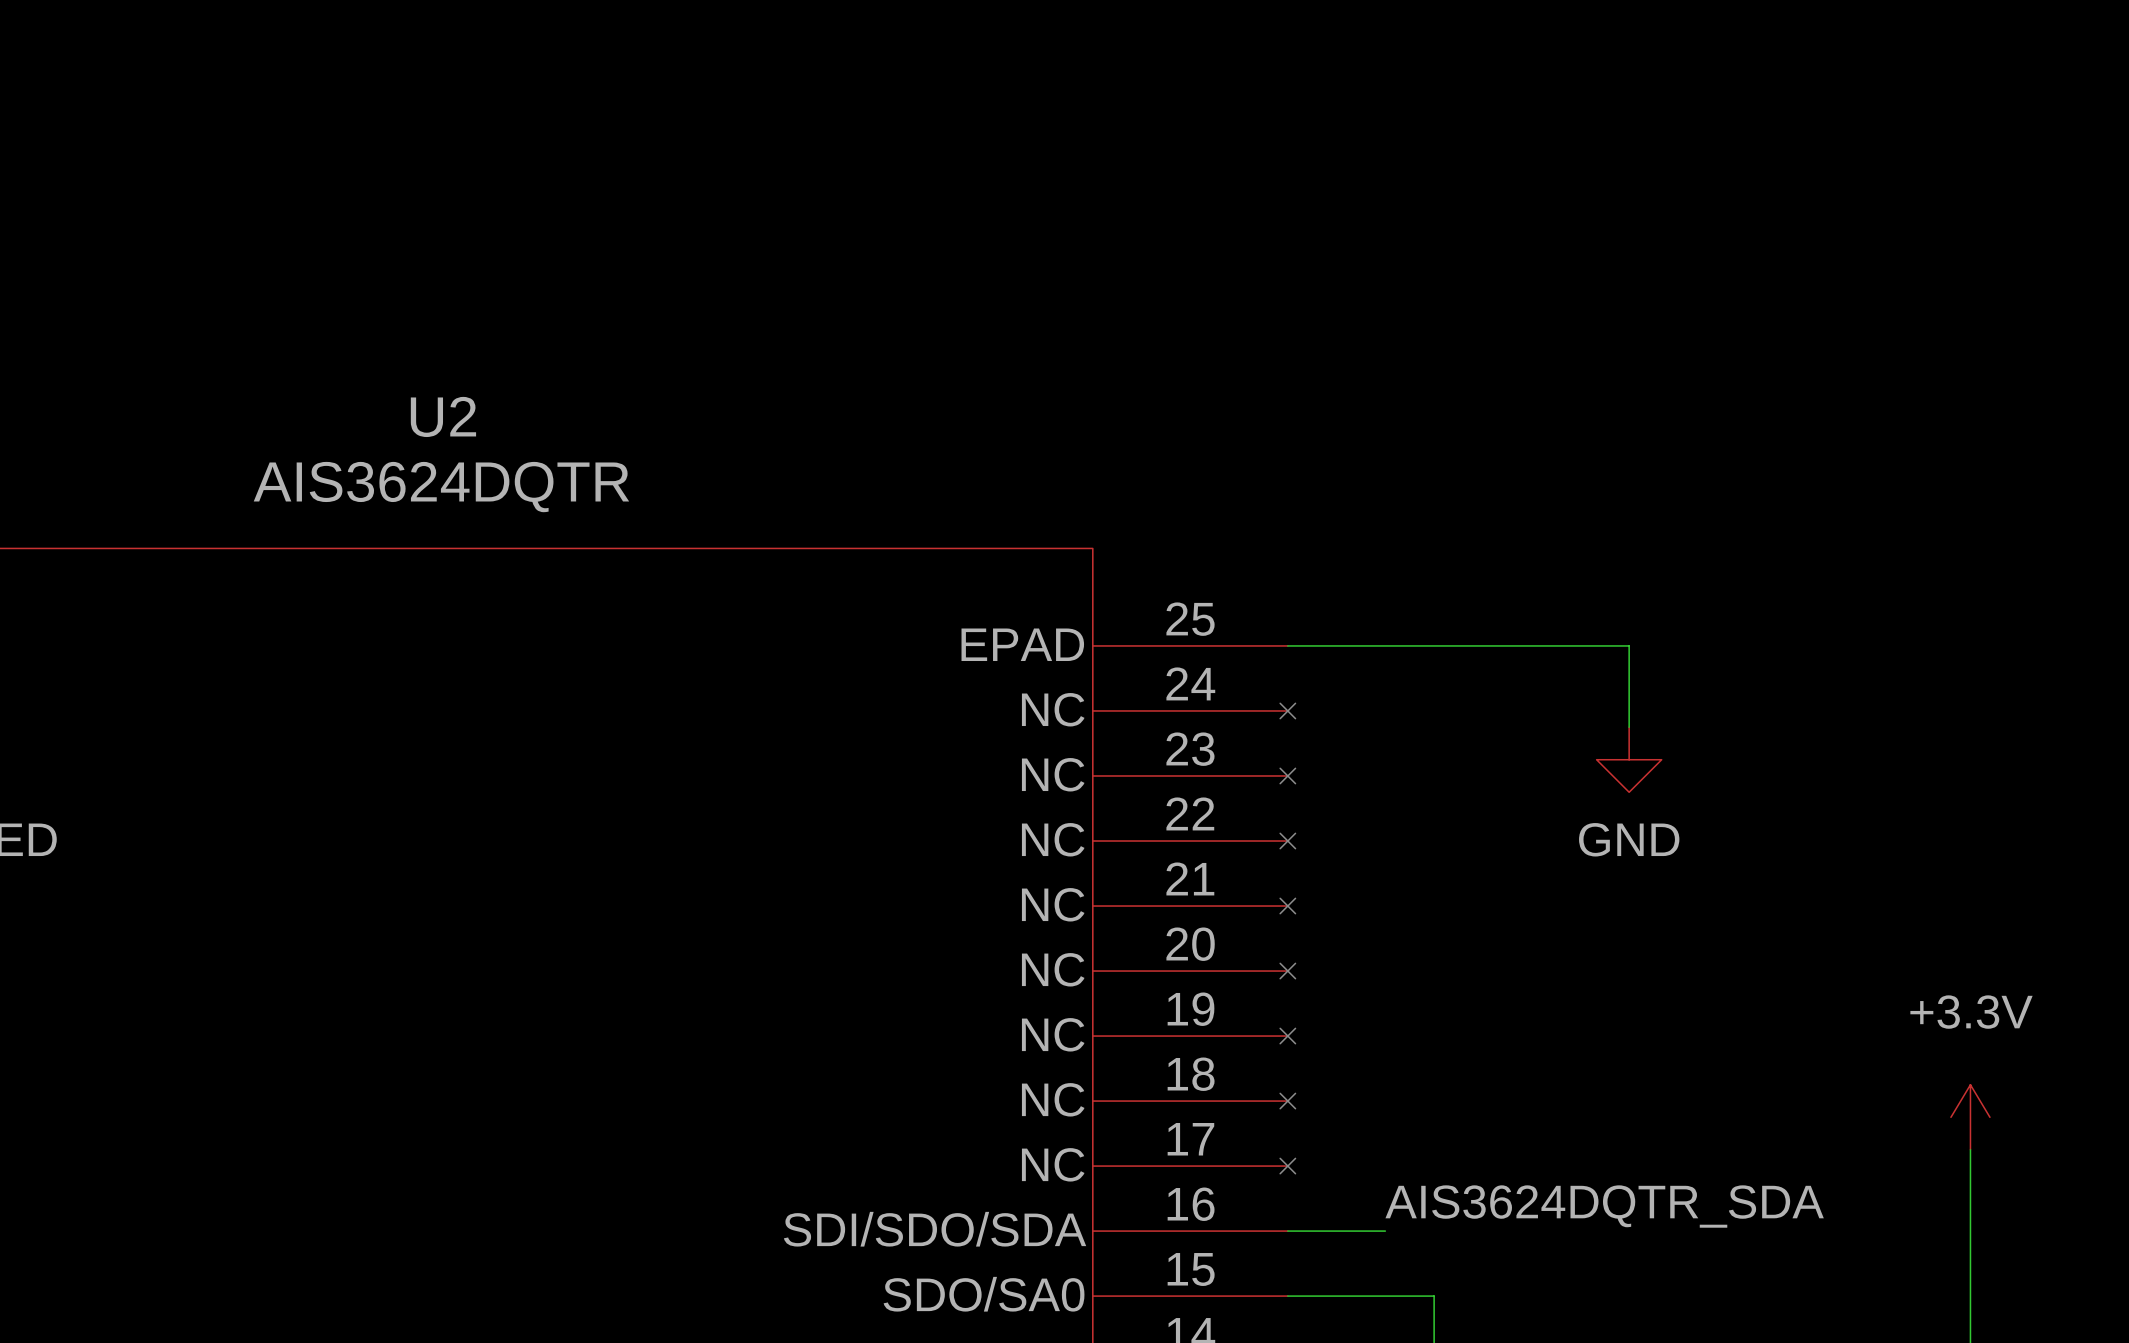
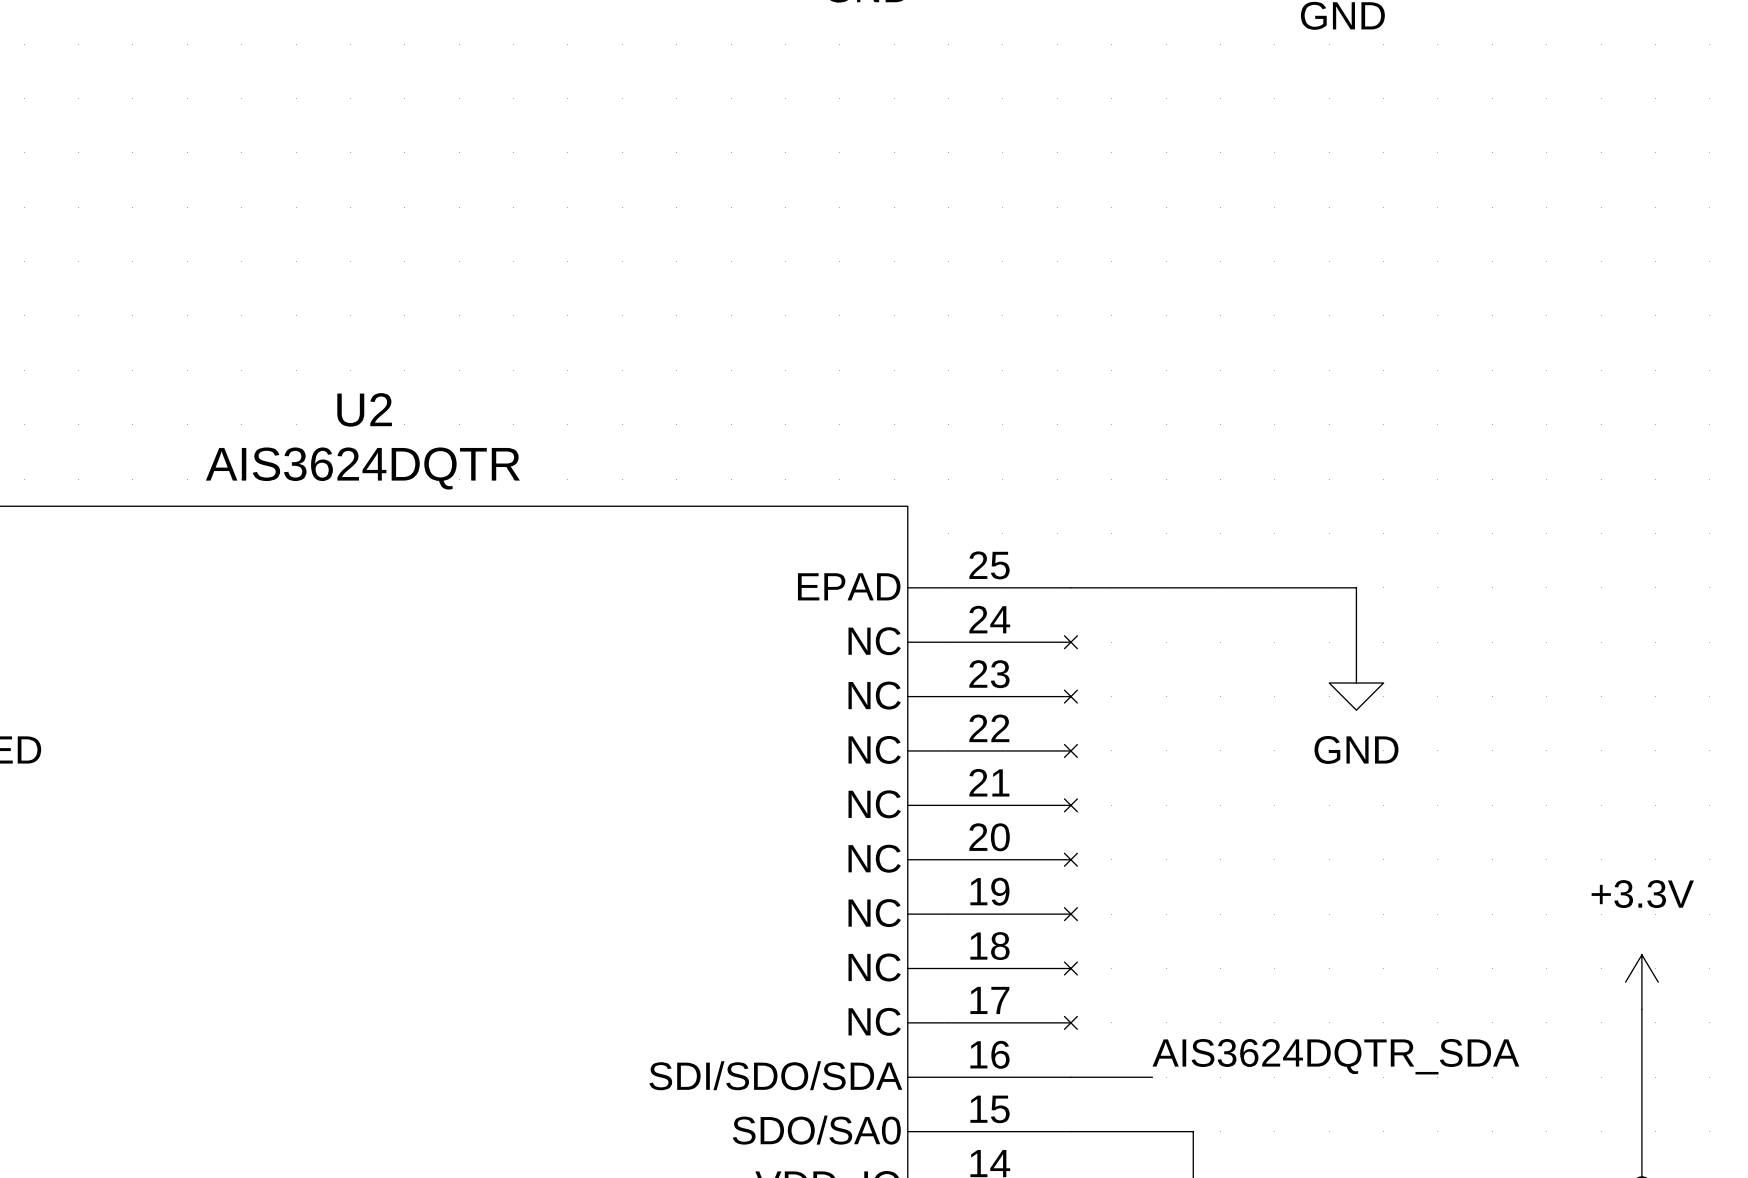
U2 name position: U2 (443, 416) -> U2 (364, 409)
U2 value position: AIS3624DQTR (441, 487) -> AIS3624DQTR (362, 468)

